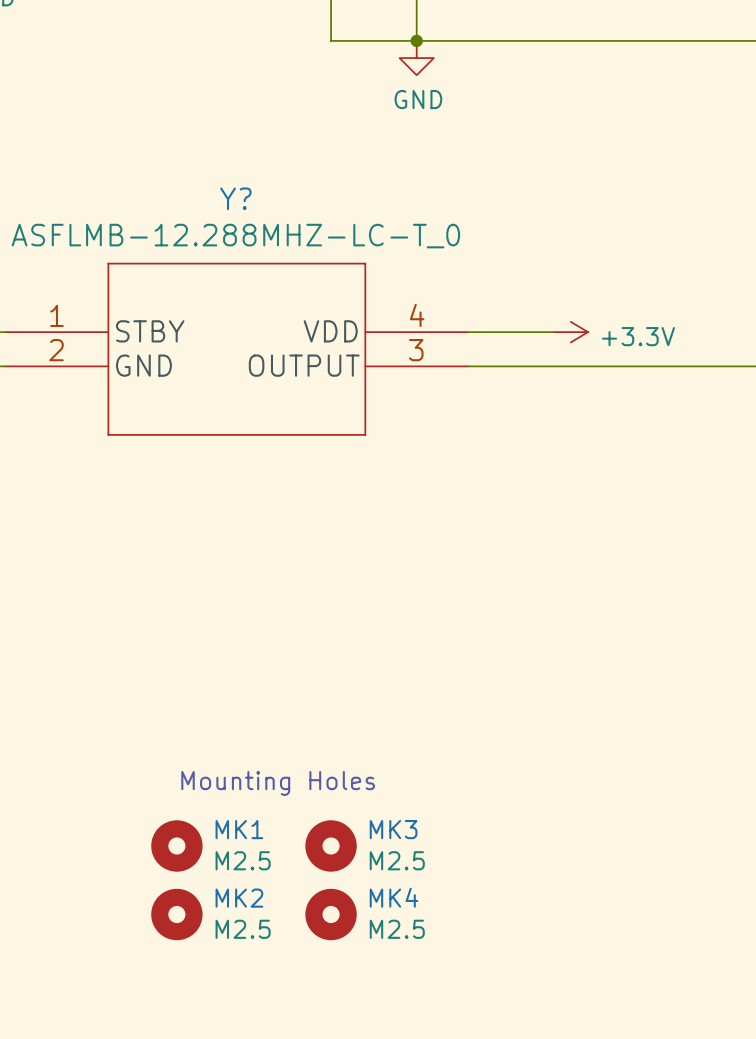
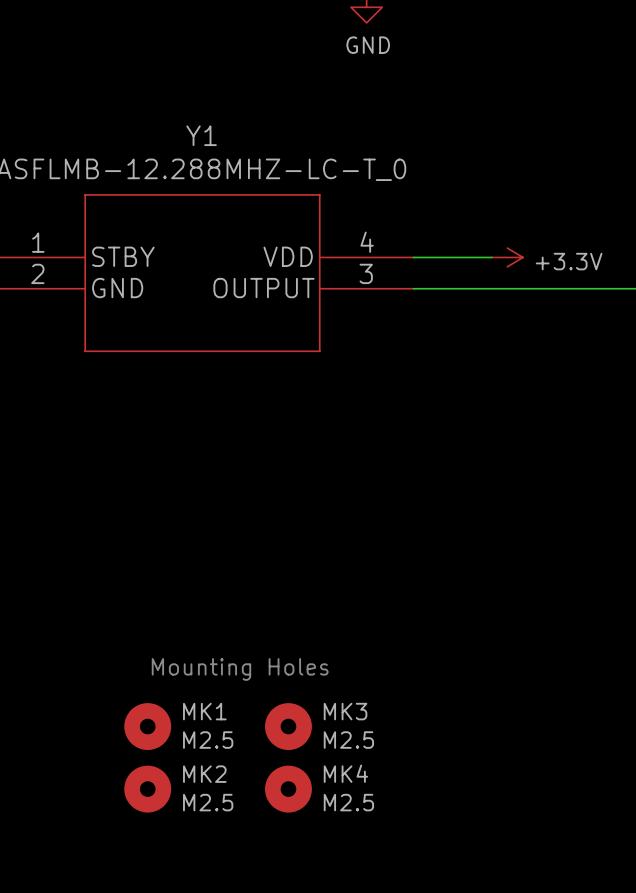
Y? name: Y? (235, 198) -> Y1 (201, 135)

